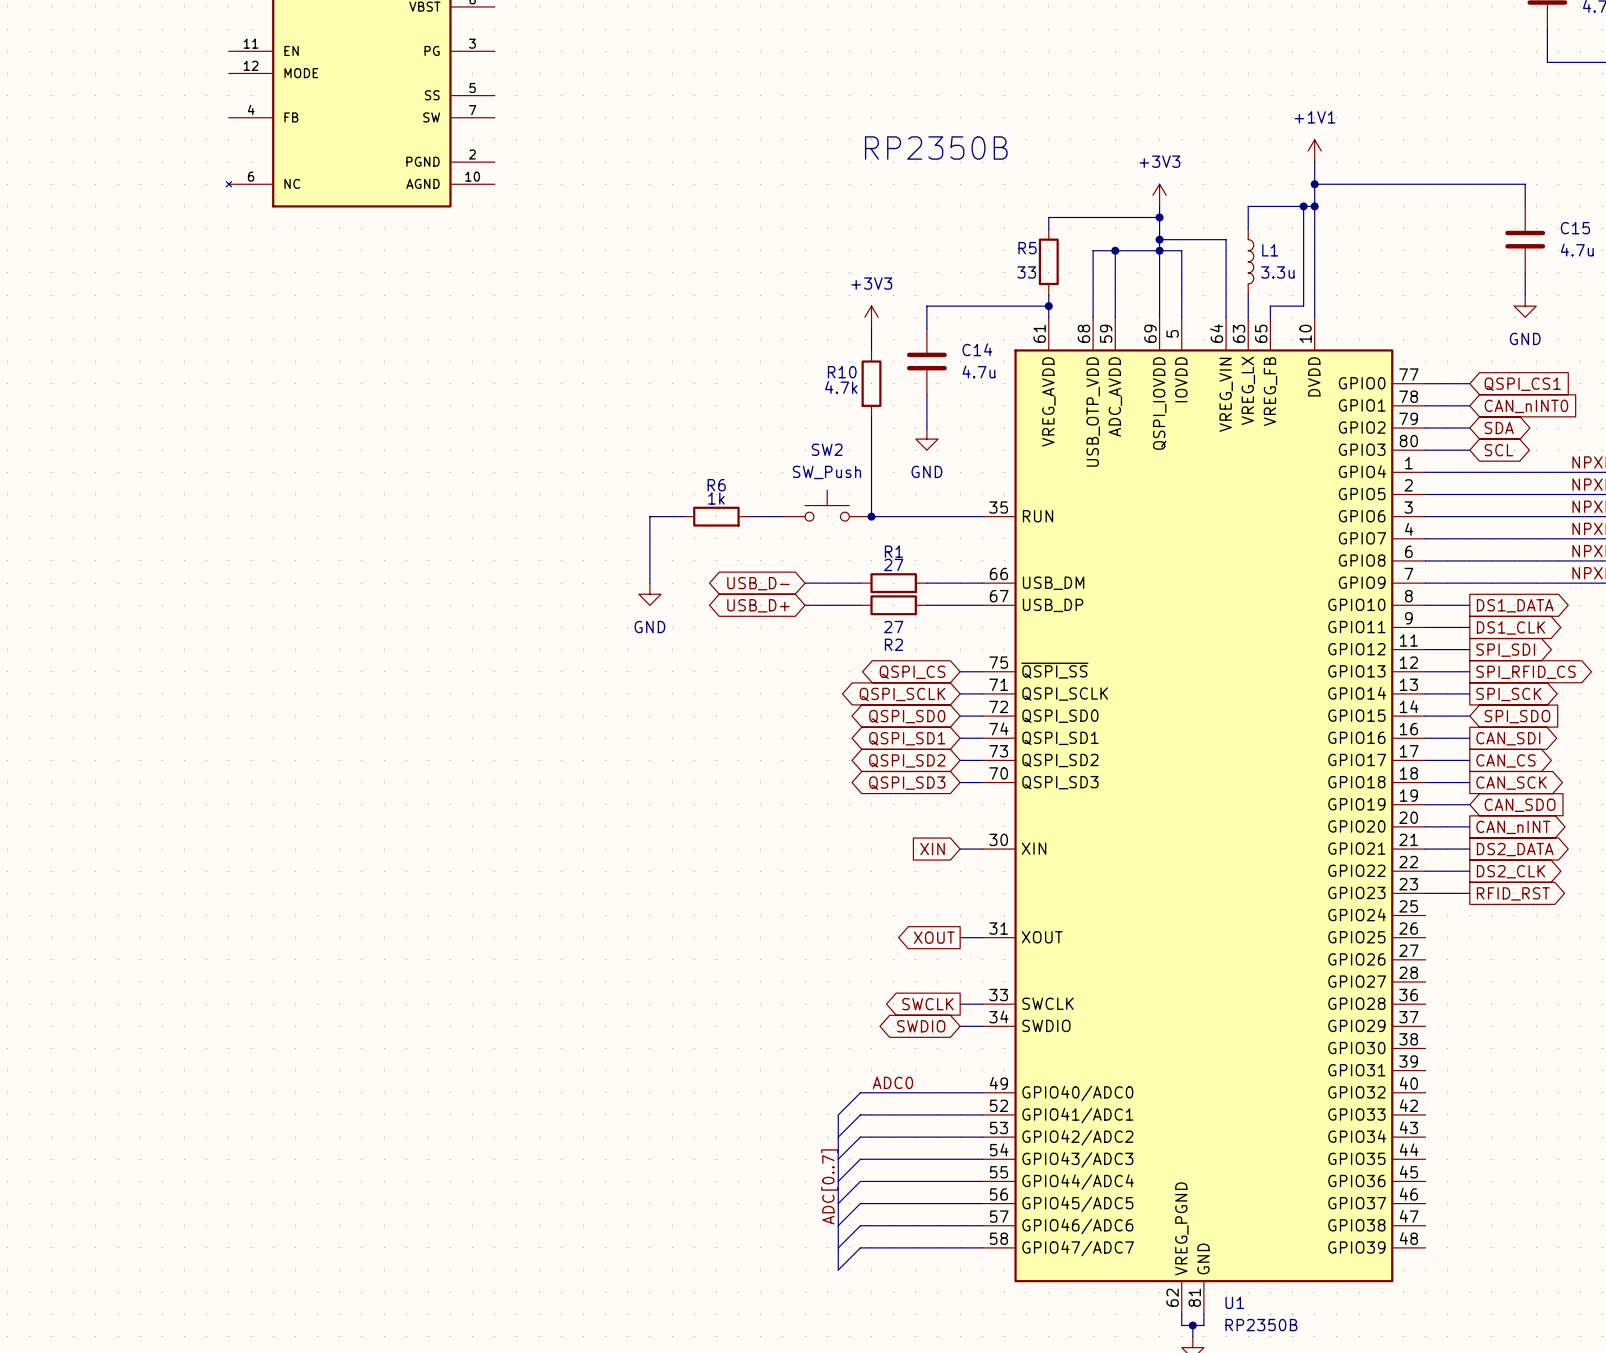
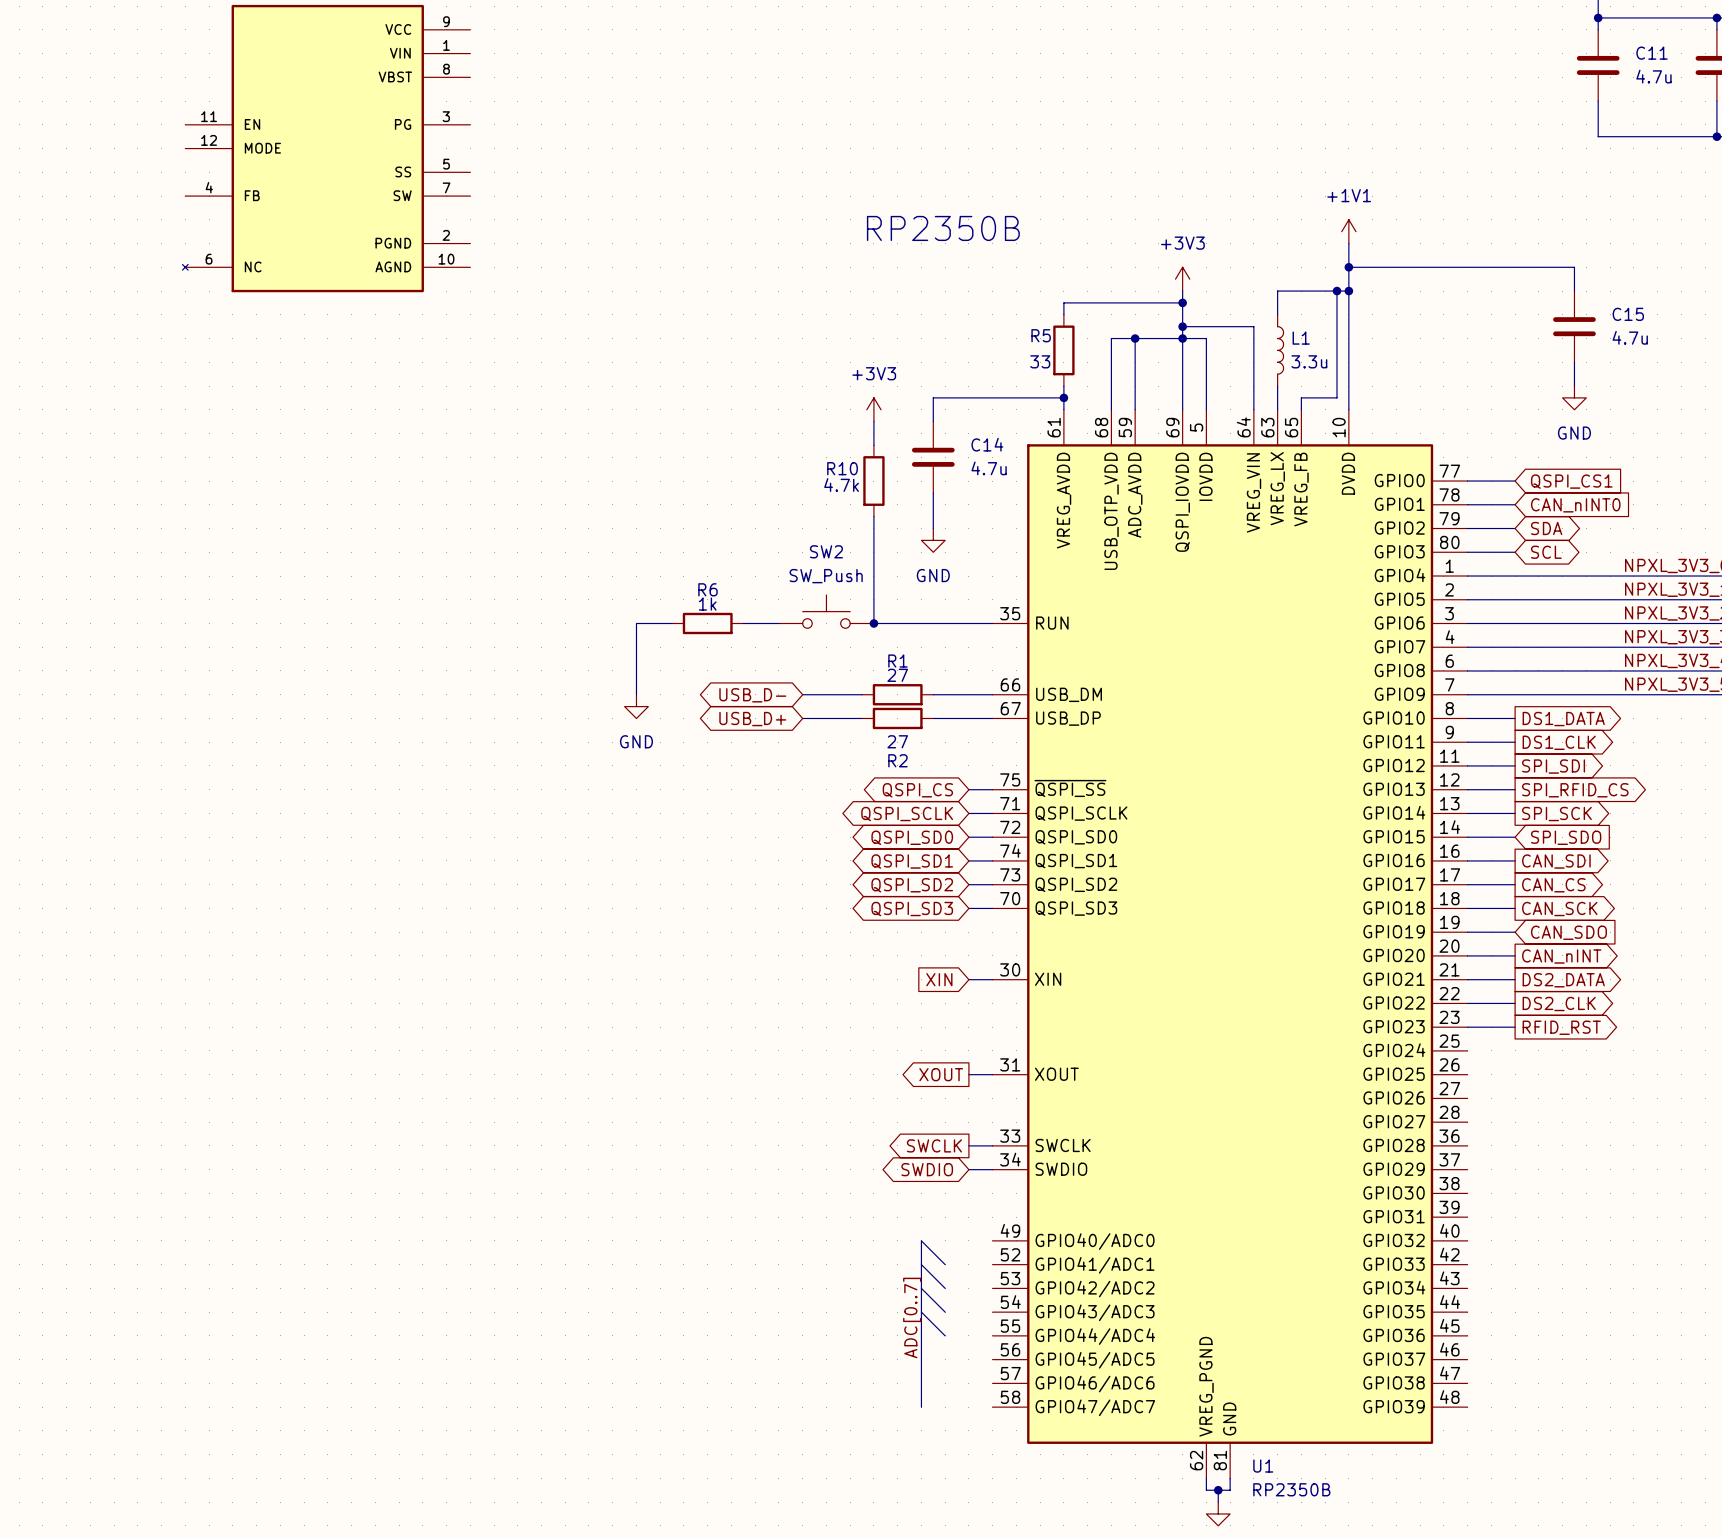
label: ADC0 (892, 1082) -> none
wire: none -> (921, 1240) (945, 1264)
wire: (982, 1092) (860, 1092) (838, 1114) -> none
bus: (838, 1114) (838, 1270) -> (921, 1240) (921, 1407)
wire: none -> (921, 1264) (945, 1288)
wire: (982, 1114) (860, 1114) (838, 1137) -> none
wire: none -> (921, 1288) (945, 1312)
wire: (982, 1137) (860, 1137) (838, 1159) -> none
wire: none -> (921, 1312) (945, 1335)
wire: (982, 1159) (860, 1159) (838, 1181) -> none
wire: (982, 1181) (860, 1181) (838, 1203) -> none
label position: ADC[0..7] (829, 1186) -> ADC[0..7] (912, 1317)
wire: (982, 1203) (860, 1203) (838, 1225) -> none
wire: (982, 1225) (860, 1225) (838, 1247) -> none
wire: (982, 1247) (860, 1247) (838, 1270) -> none

